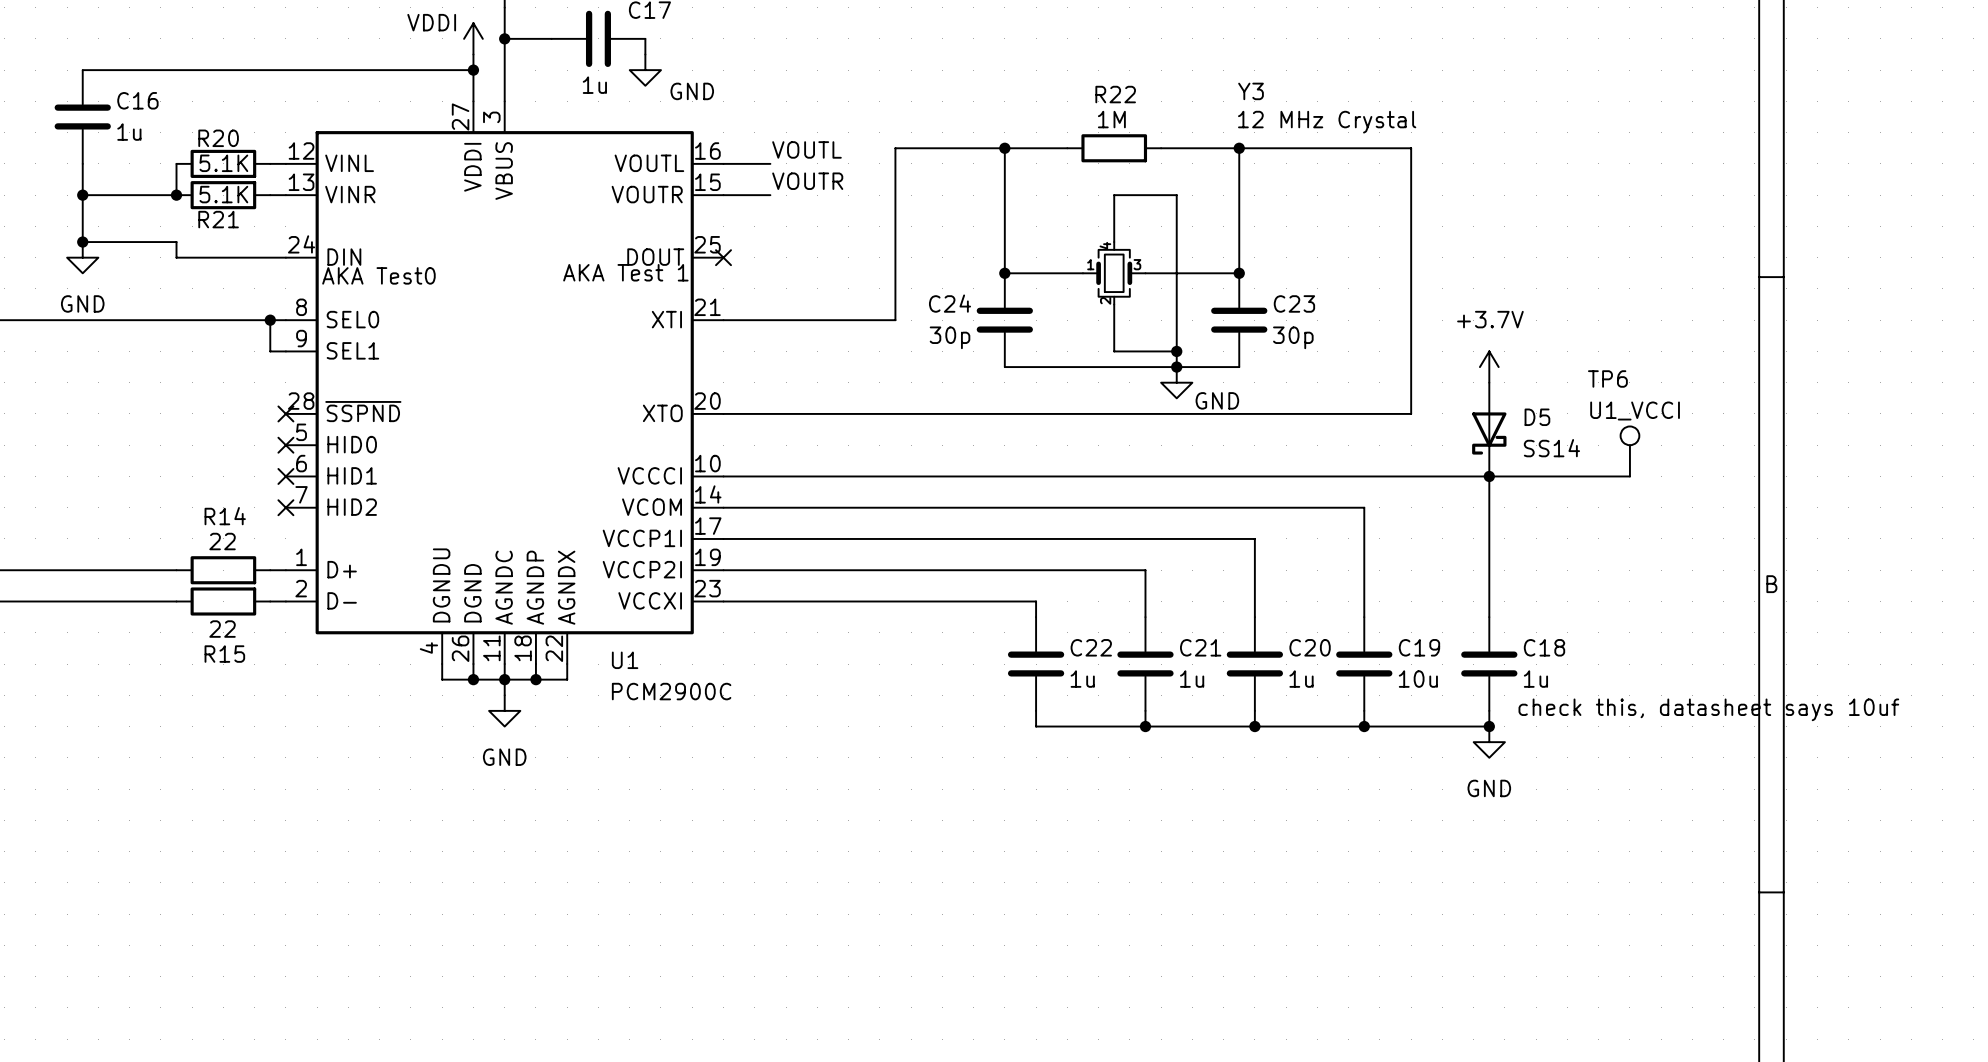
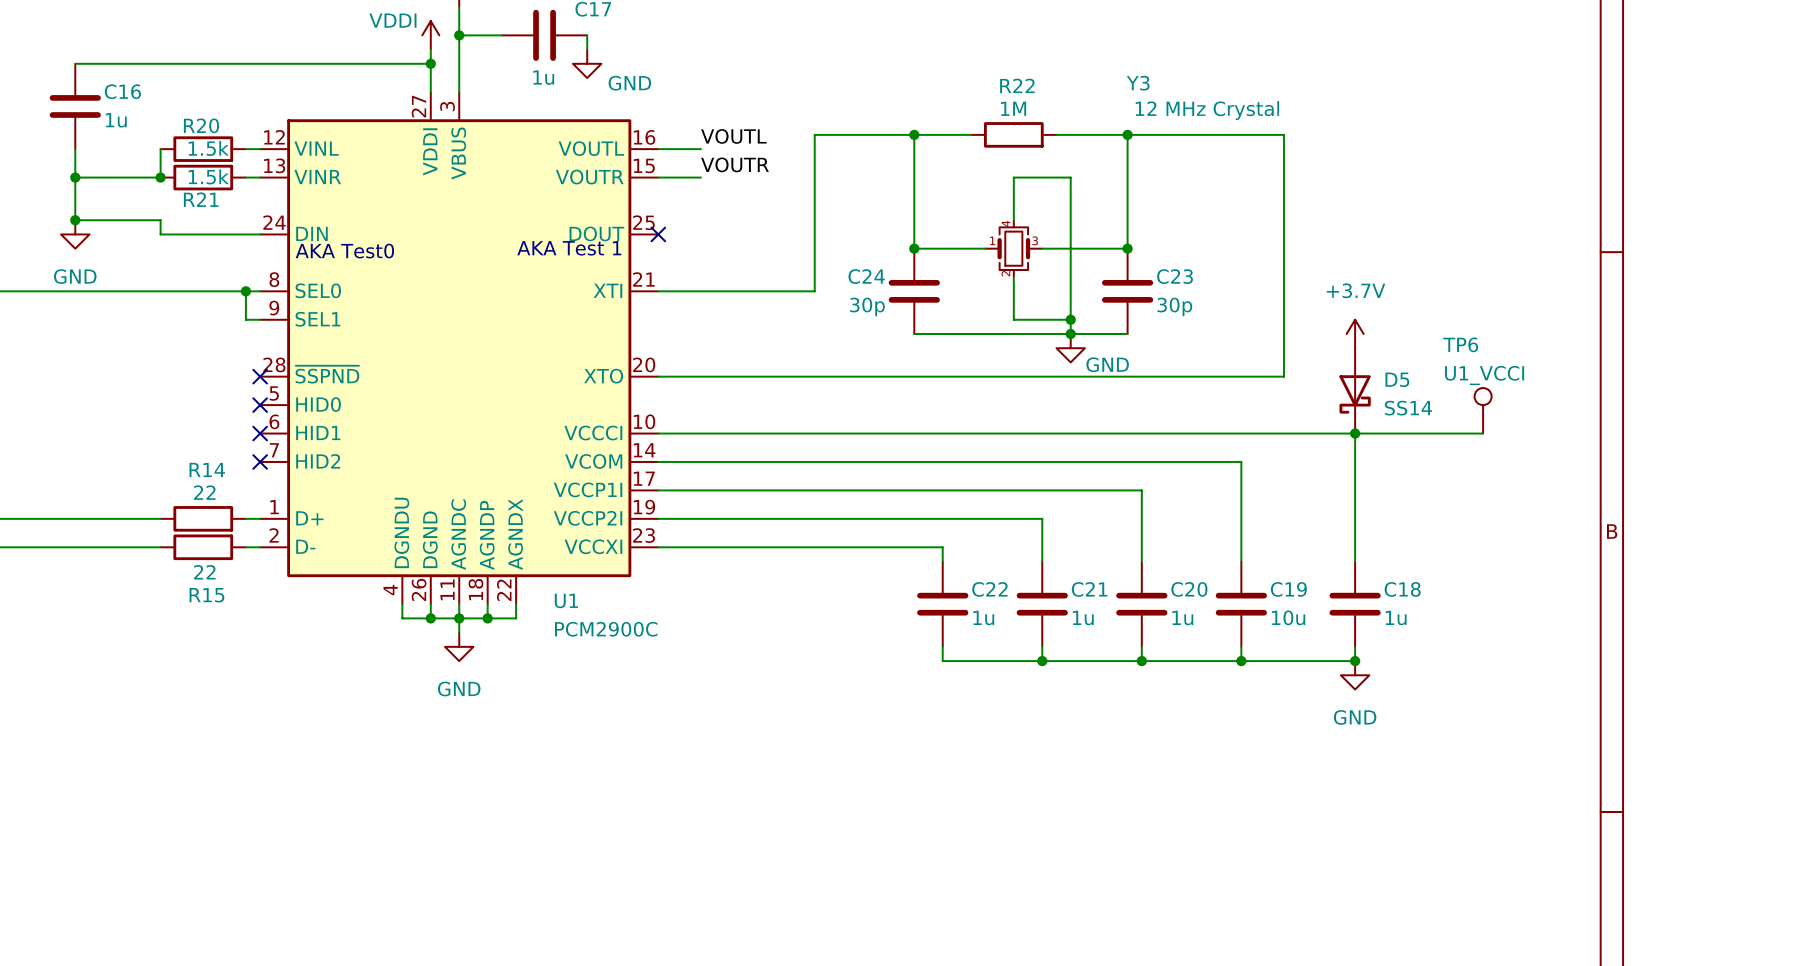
R20 value: 5.1K (223, 163) -> 1.5k (208, 148)
R21 value: 5.1K (223, 194) -> 1.5k (208, 176)
text: check this, datasheet says 10uf (1708, 709) -> none

